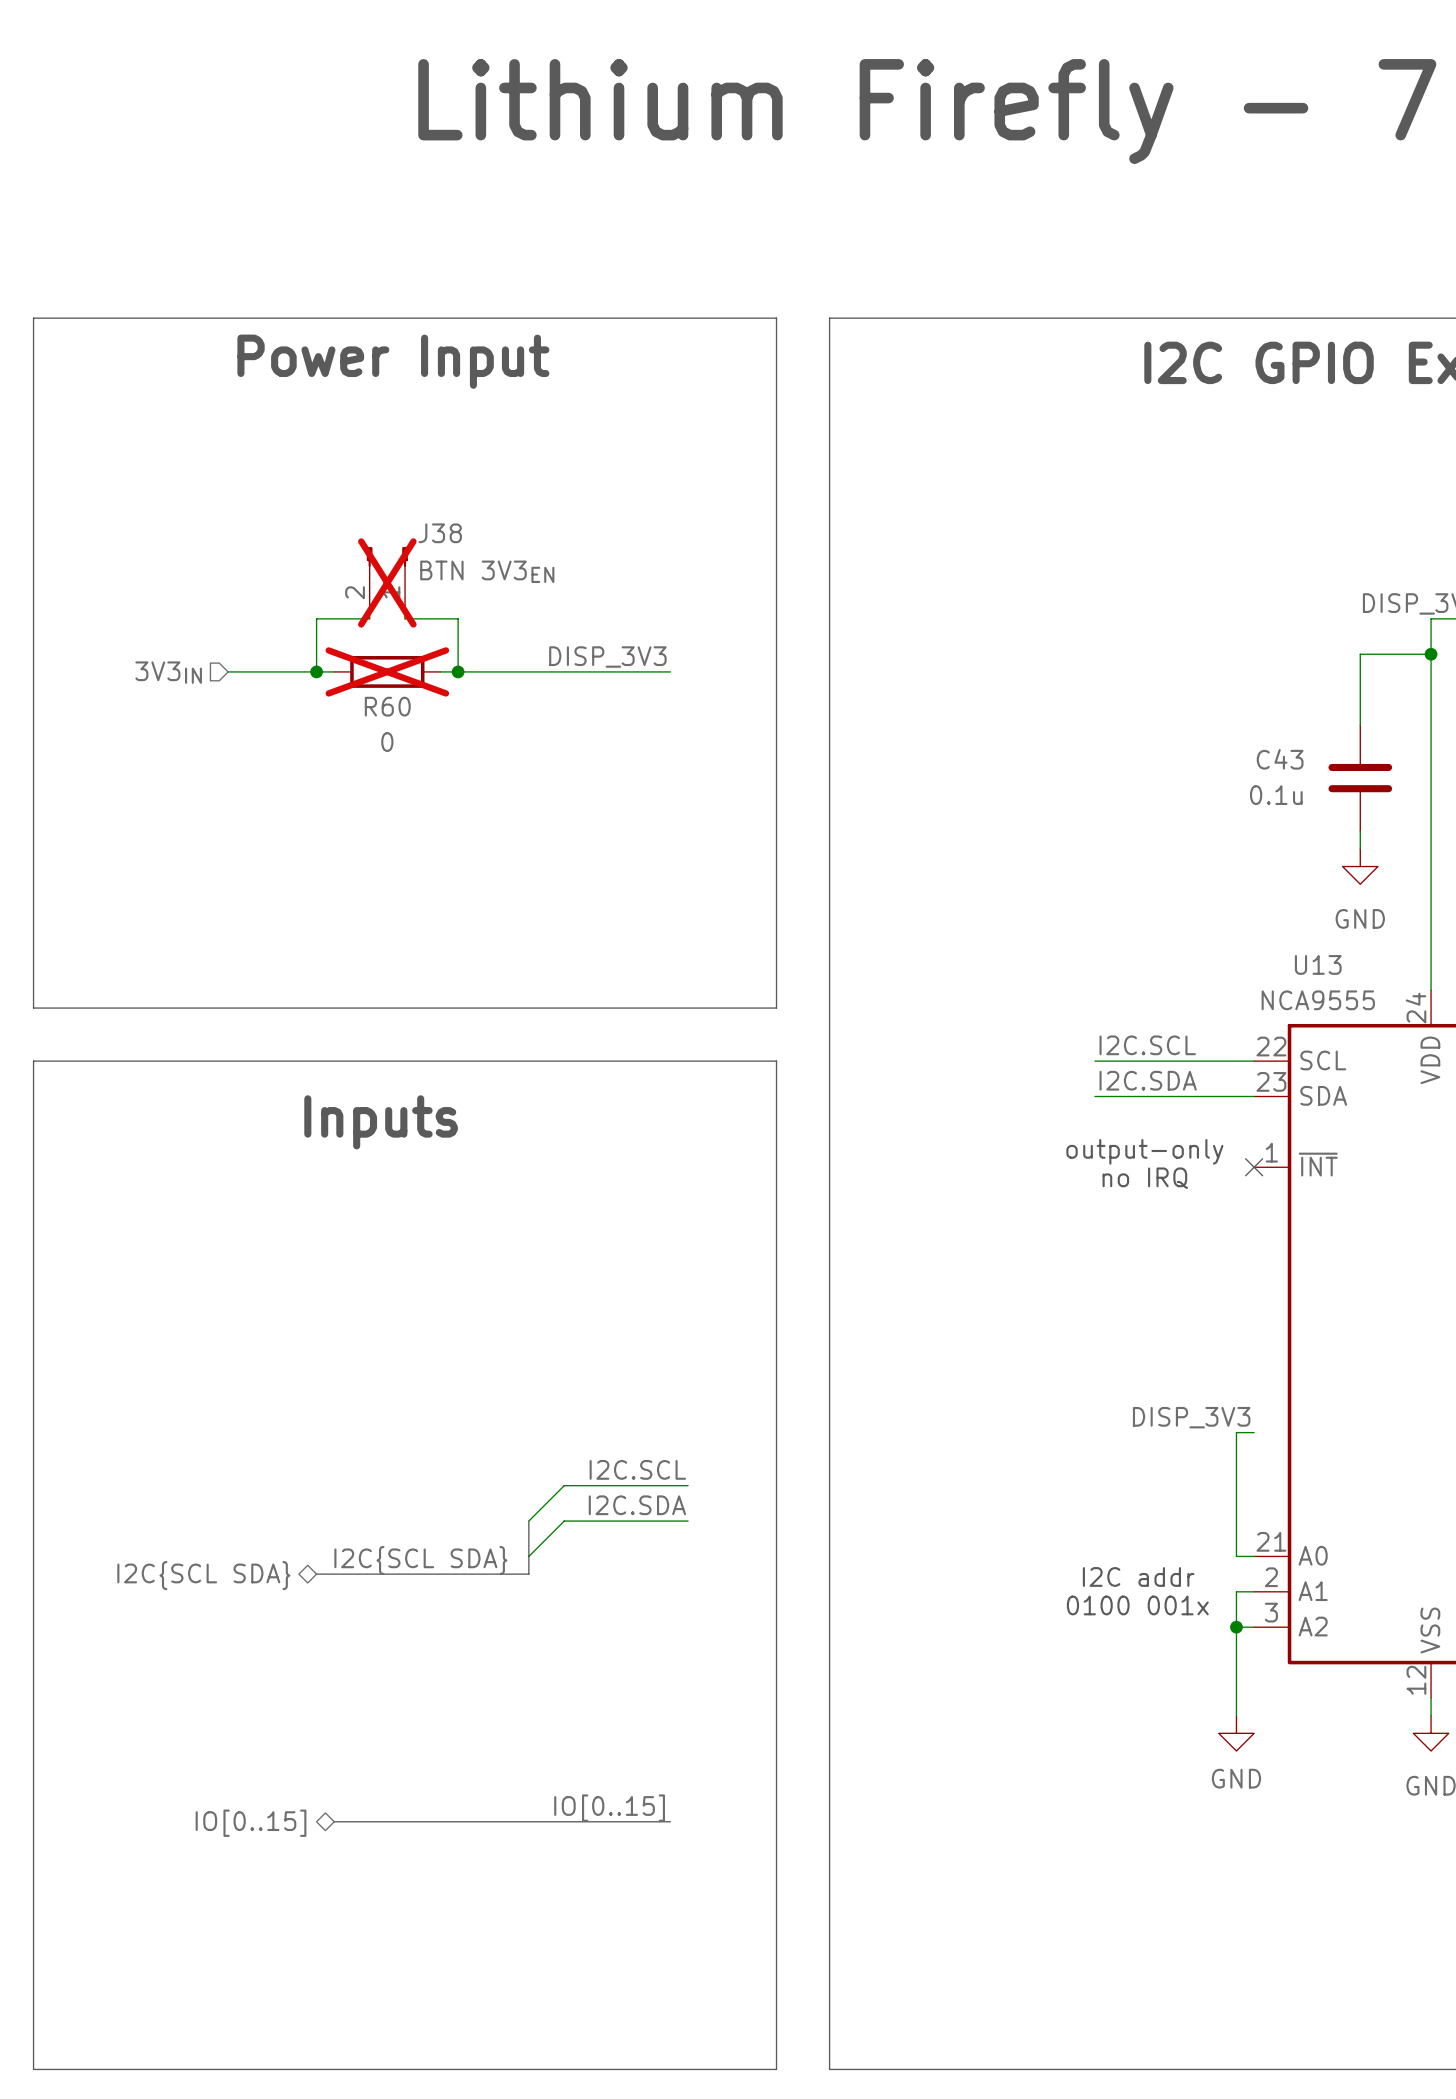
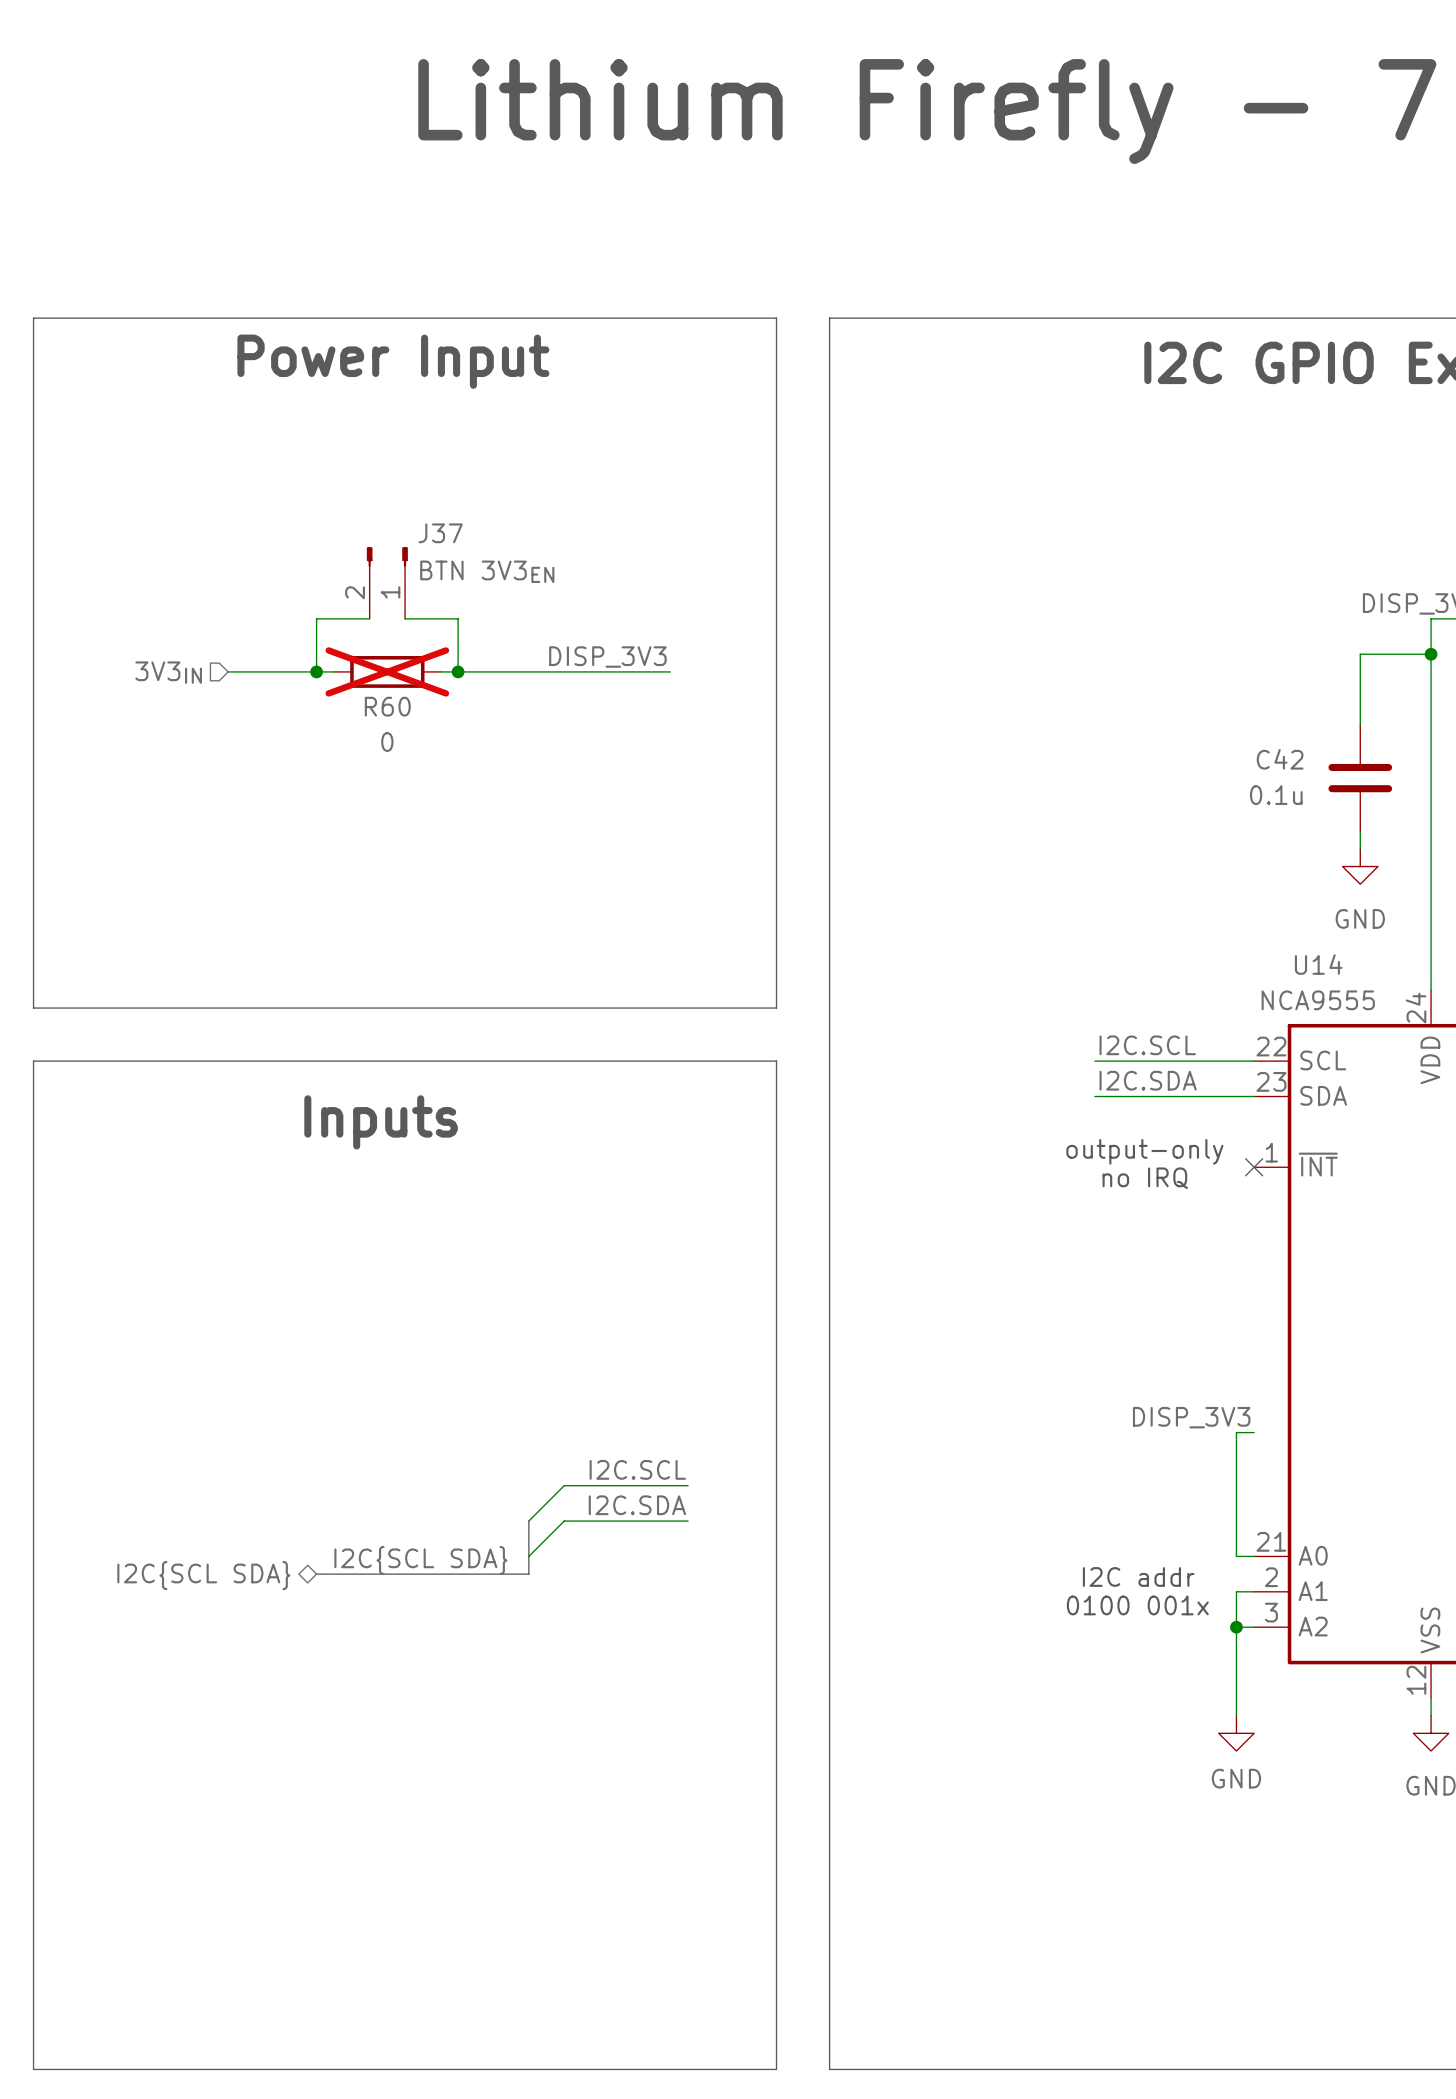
J38 name: J38 (440, 533) -> J37 (440, 533)
J38 do-not-place cross: (387, 582) -> none
C43 name: C43 (1280, 759) -> C42 (1280, 759)
U13 name: U13 (1318, 964) -> U14 (1318, 964)
label: IO[0..15] (609, 1808) -> none
bus: (334, 1821) (670, 1821) -> none
hierarchical label: IO[0..15] (251, 1823) -> none

